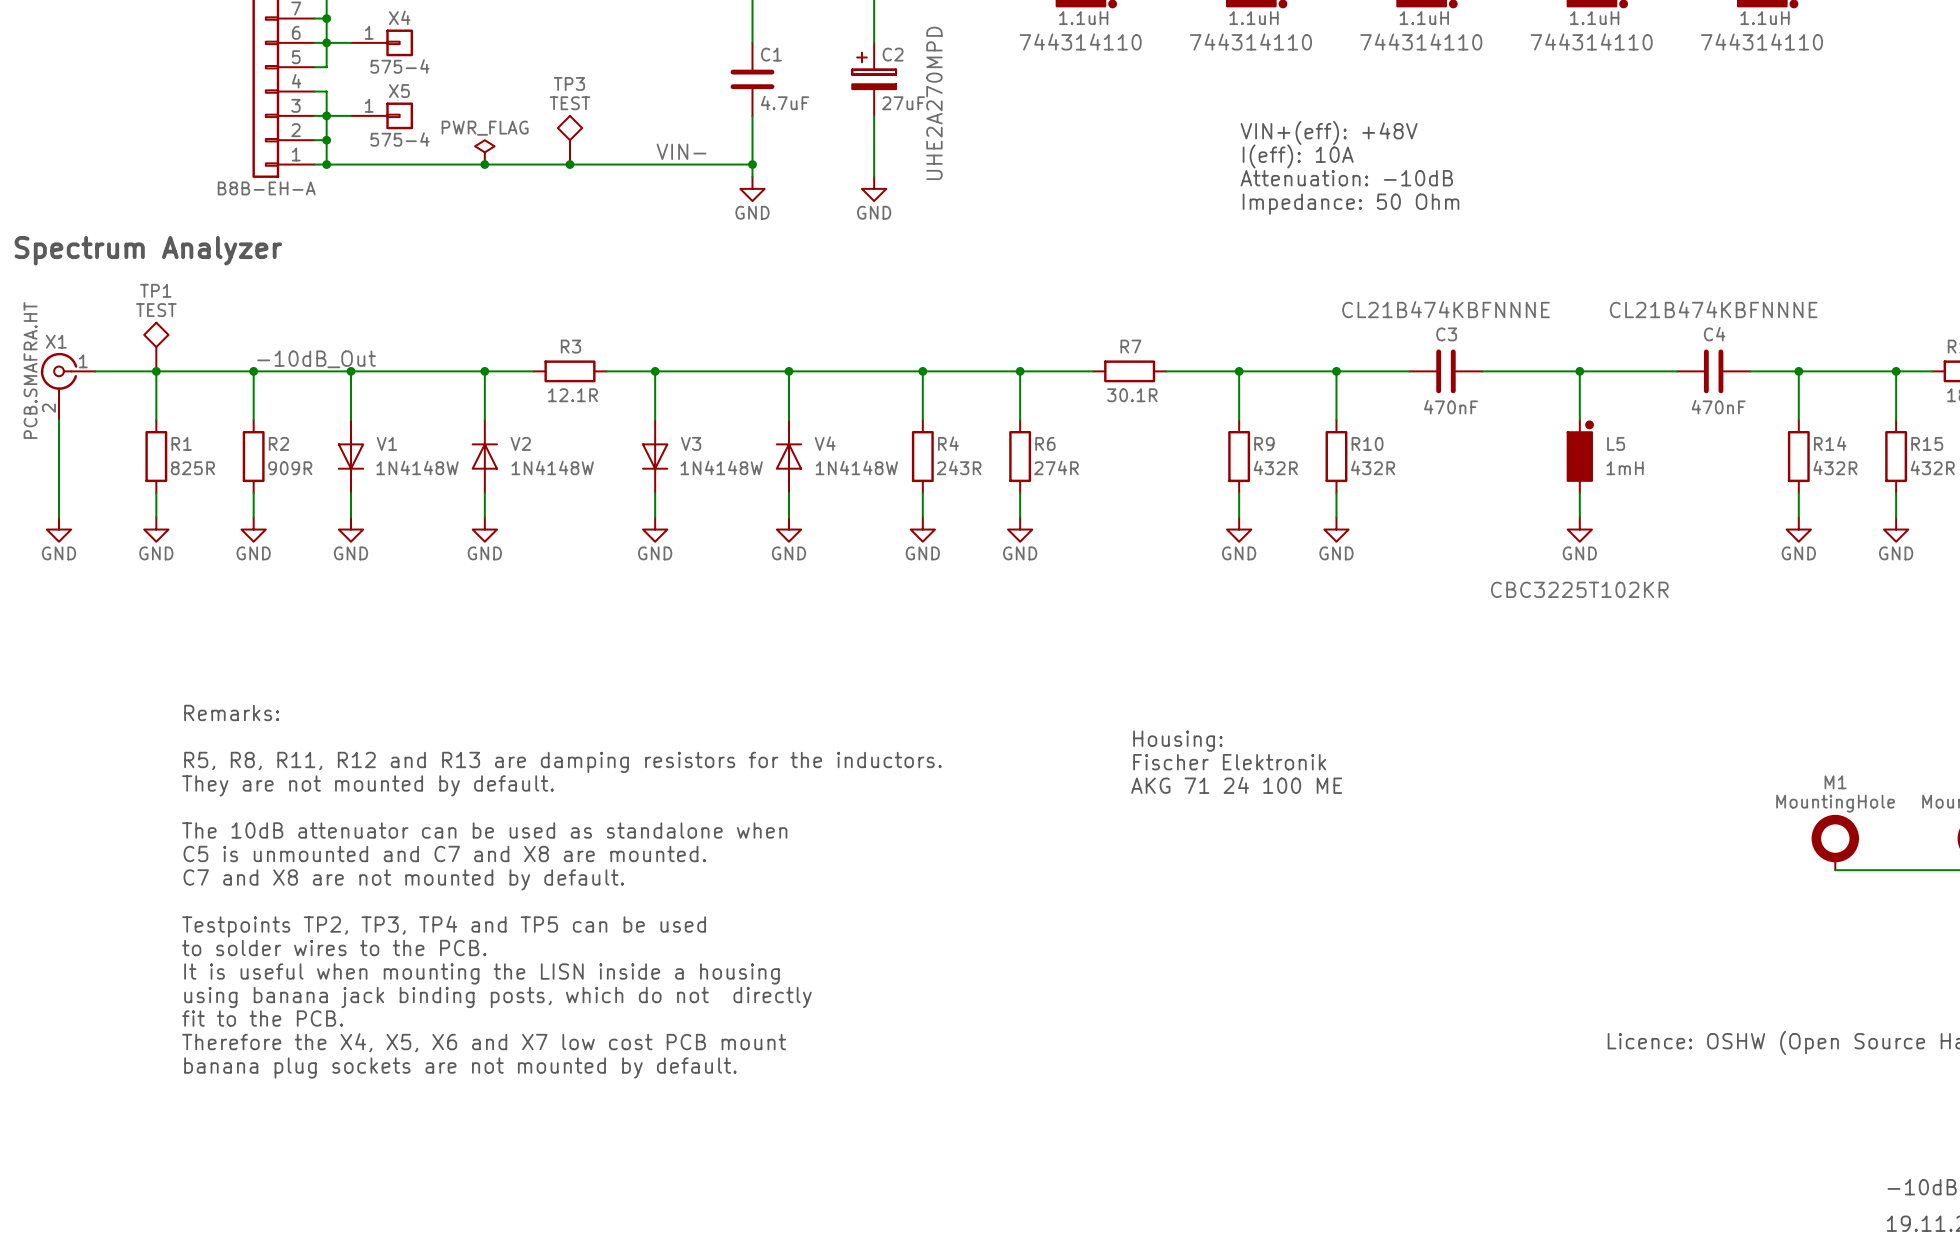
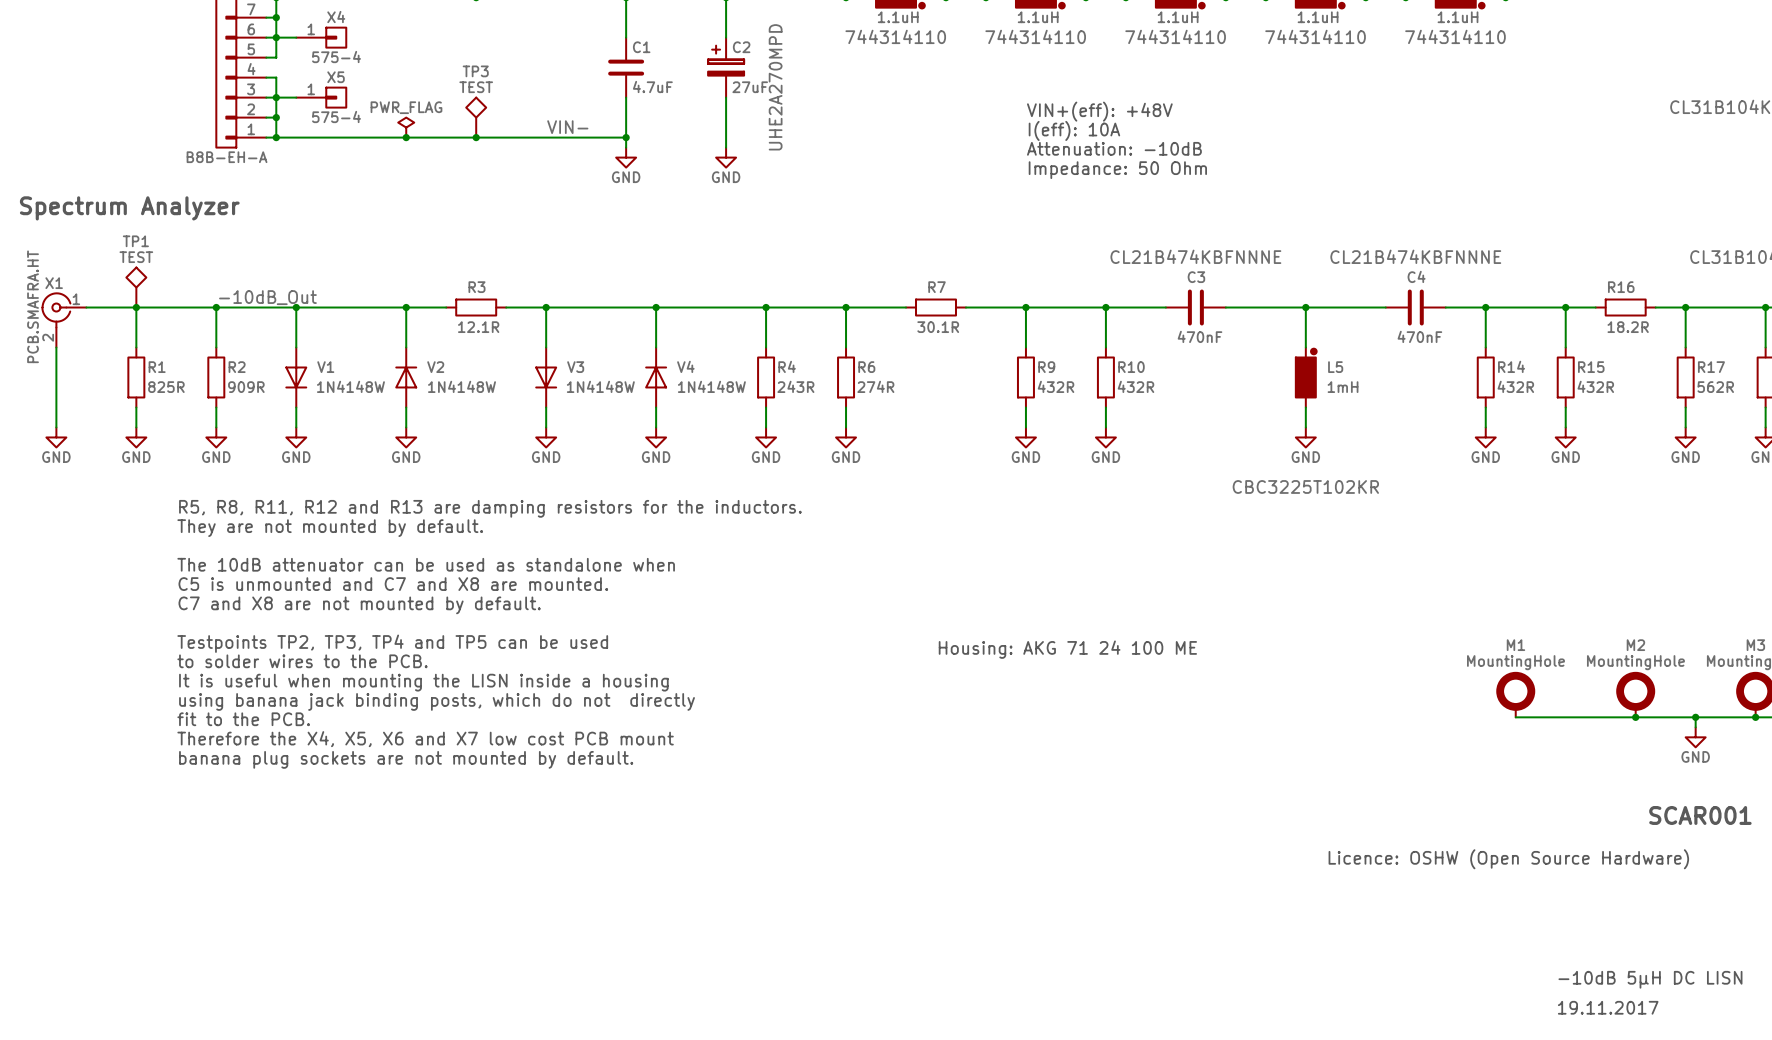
text: Remarks: (231, 712) -> none
text: Housing: (1177, 741) -> none
text position: R5, R8, R11, R12 and R13 are damping resistors for the inductors. (562, 762) -> R5, R8, R11, R12 and R13 are damping resistors for the inductors. (490, 508)
text: Fischer Elektronik (1229, 762) -> none
text position: They are not mounted by default. (367, 785) -> They are not mounted by default. (330, 528)
text: AKG 71 24 100 ME (1236, 785) -> Housing: AKG 71 24 100 ME (1067, 649)
text position: The 10dB attenuator can be used as standalone when (484, 830) -> The 10dB attenuator can be used as standalone when (426, 564)
text position: C5 is unmounted and C7 and X8 are mounted. (444, 853) -> C5 is unmounted and C7 and X8 are mounted. (393, 584)
text position: C7 and X8 are not mounted by default. (403, 879) -> C7 and X8 are not mounted by default. (359, 605)
text position: Testpoints TP2, TP3, TP4 and TP5 can be used (444, 926) -> Testpoints TP2, TP3, TP4 and TP5 can be used (392, 643)
text position: to solder wires to the PCB. (334, 948) -> to solder wires to the PCB. (302, 661)
text position: It is useful when mounting the LISN inside a housing (481, 973) -> It is useful when mounting the LISN inside a housing (423, 682)
text position: using banana jack binding posts, which do not directly (497, 997) -> using banana jack binding posts, which do not directly (437, 701)
text position: fit to the PCB. (262, 1018) -> fit to the PCB. (243, 719)
text position: Therefore the X4, X5, X6 and X7 low cost PCB mount (484, 1042) -> Therefore the X4, X5, X6 and X7 low cost PCB mount (425, 739)
text position: banana plug sockets are not mounted by default. (460, 1067) -> banana plug sockets are not mounted by default. (406, 759)

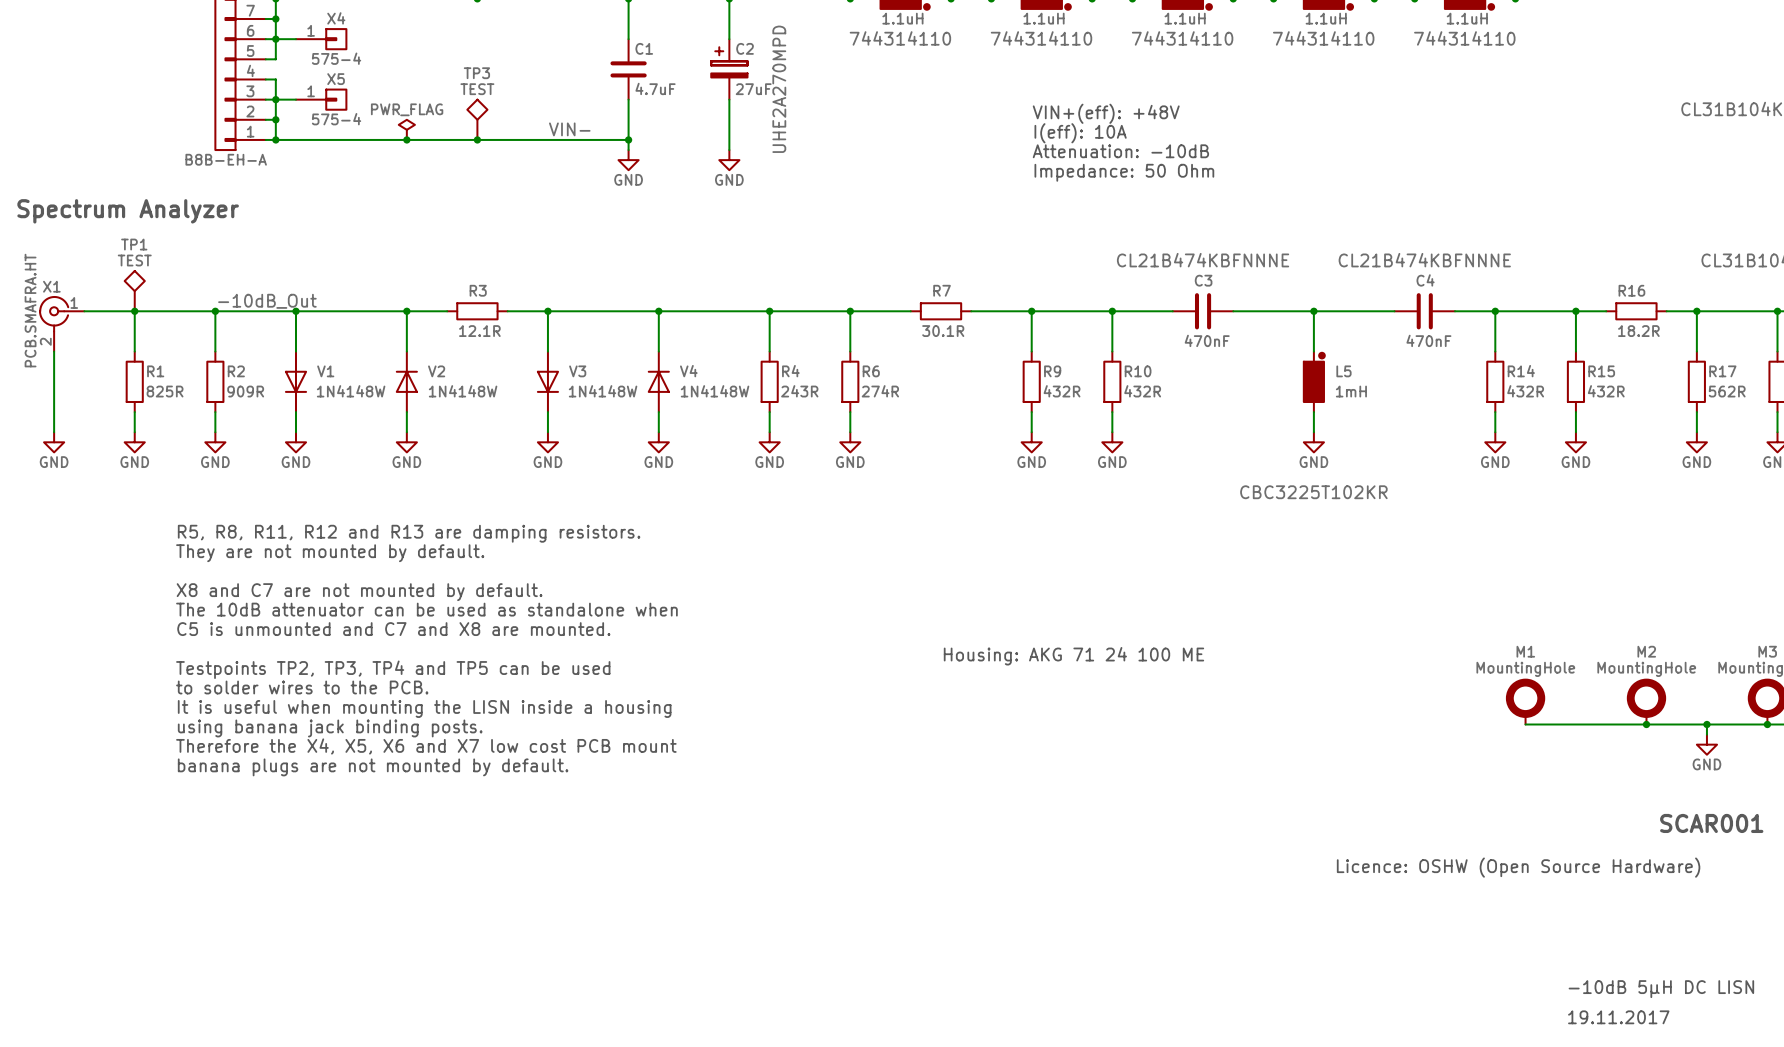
text: R5, R8, R11, R12 and R13 are damping resistors for the inductors. (490, 508) -> none
text: They are not mounted by default. (330, 528) -> R5, R8, R11, R12 and R13 are damping resistors. (409, 533)
text: none -> They are not mounted by default. (330, 553)
text: The 10dB attenuator can be used as standalone when (426, 564) -> none
text: C5 is unmounted and C7 and X8 are mounted. (393, 584) -> X8 and C7 are not mounted by default. (359, 592)
text: C7 and X8 are not mounted by default. (359, 605) -> The 10dB attenuator can be used as standalone when (426, 609)
text: none -> C5 is unmounted and C7 and X8 are mounted. (393, 629)
text: Testpoints TP2, TP3, TP4 and TP5 can be used (392, 643) -> none
text: to solder wires to the PCB. (302, 661) -> Testpoints TP2, TP3, TP4 and TP5 can be used (393, 669)
text: It is useful when mounting the LISN inside a housing (423, 682) -> to solder wires to the PCB. (302, 687)
text: using banana jack binding posts, which do not directly (437, 701) -> It is useful when mounting the LISN inside a housing (424, 708)
text: fit to the PCB. (243, 719) -> using banana jack binding posts. (330, 728)
text: banana plug sockets are not mounted by default. (406, 759) -> banana plugs are not mounted by default. (373, 767)

